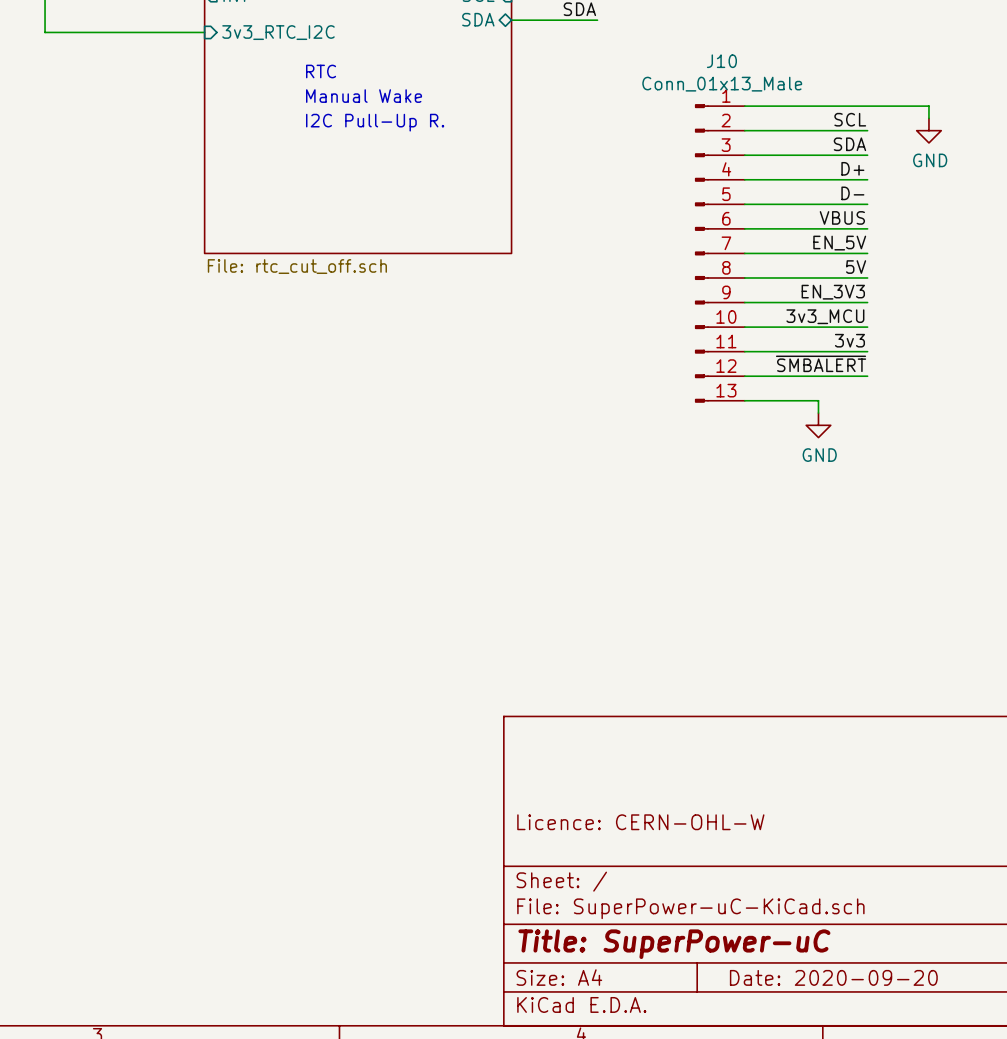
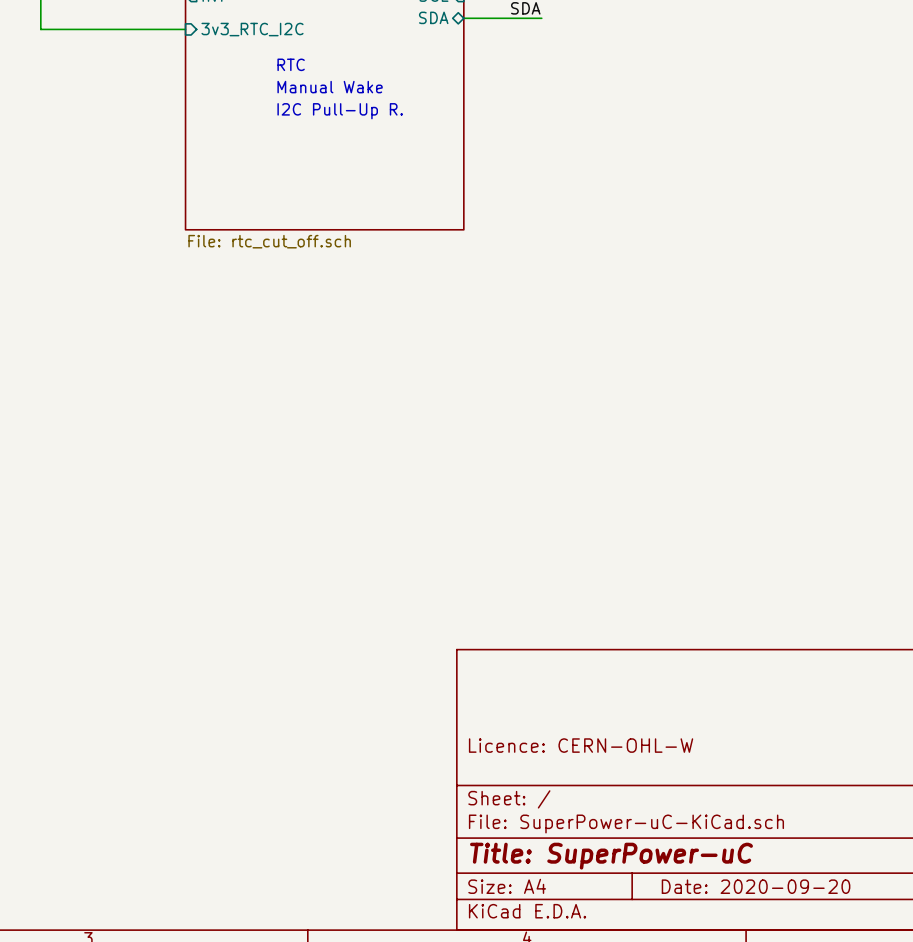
wire: (744, 106) (928, 106) (928, 118) -> none
label: SCL (850, 119) -> none
wire: (744, 130) (867, 130) -> none
power symbol: GND (928, 130) -> none
label: SDA (849, 144) -> none
wire: (744, 155) (867, 155) -> none
label: D+ (852, 168) -> none
wire: (744, 179) (867, 179) -> none
label: D- (852, 193) -> none
wire: (744, 204) (867, 204) -> none
label: VBUS (842, 217) -> none
wire: (744, 228) (867, 228) -> none
label: EN_5V (839, 243) -> none
J10: Conn_01x13_Male (719, 253) -> none
wire: (744, 253) (867, 253) -> none
label: 5V (856, 267) -> none
wire: (744, 277) (867, 277) -> none
label: EN_3V3 (833, 292) -> none
wire: (744, 302) (867, 302) -> none
label: 3v3_MCU (825, 316) -> none
wire: (744, 327) (867, 327) -> none
label: 3v3 (849, 340) -> none
wire: (744, 351) (867, 351) -> none
label: ~{SMBALERT} (821, 363) -> none
wire: (744, 376) (867, 376) -> none
wire: (744, 400) (818, 400) (818, 413) -> none
power symbol: GND (818, 425) -> none

